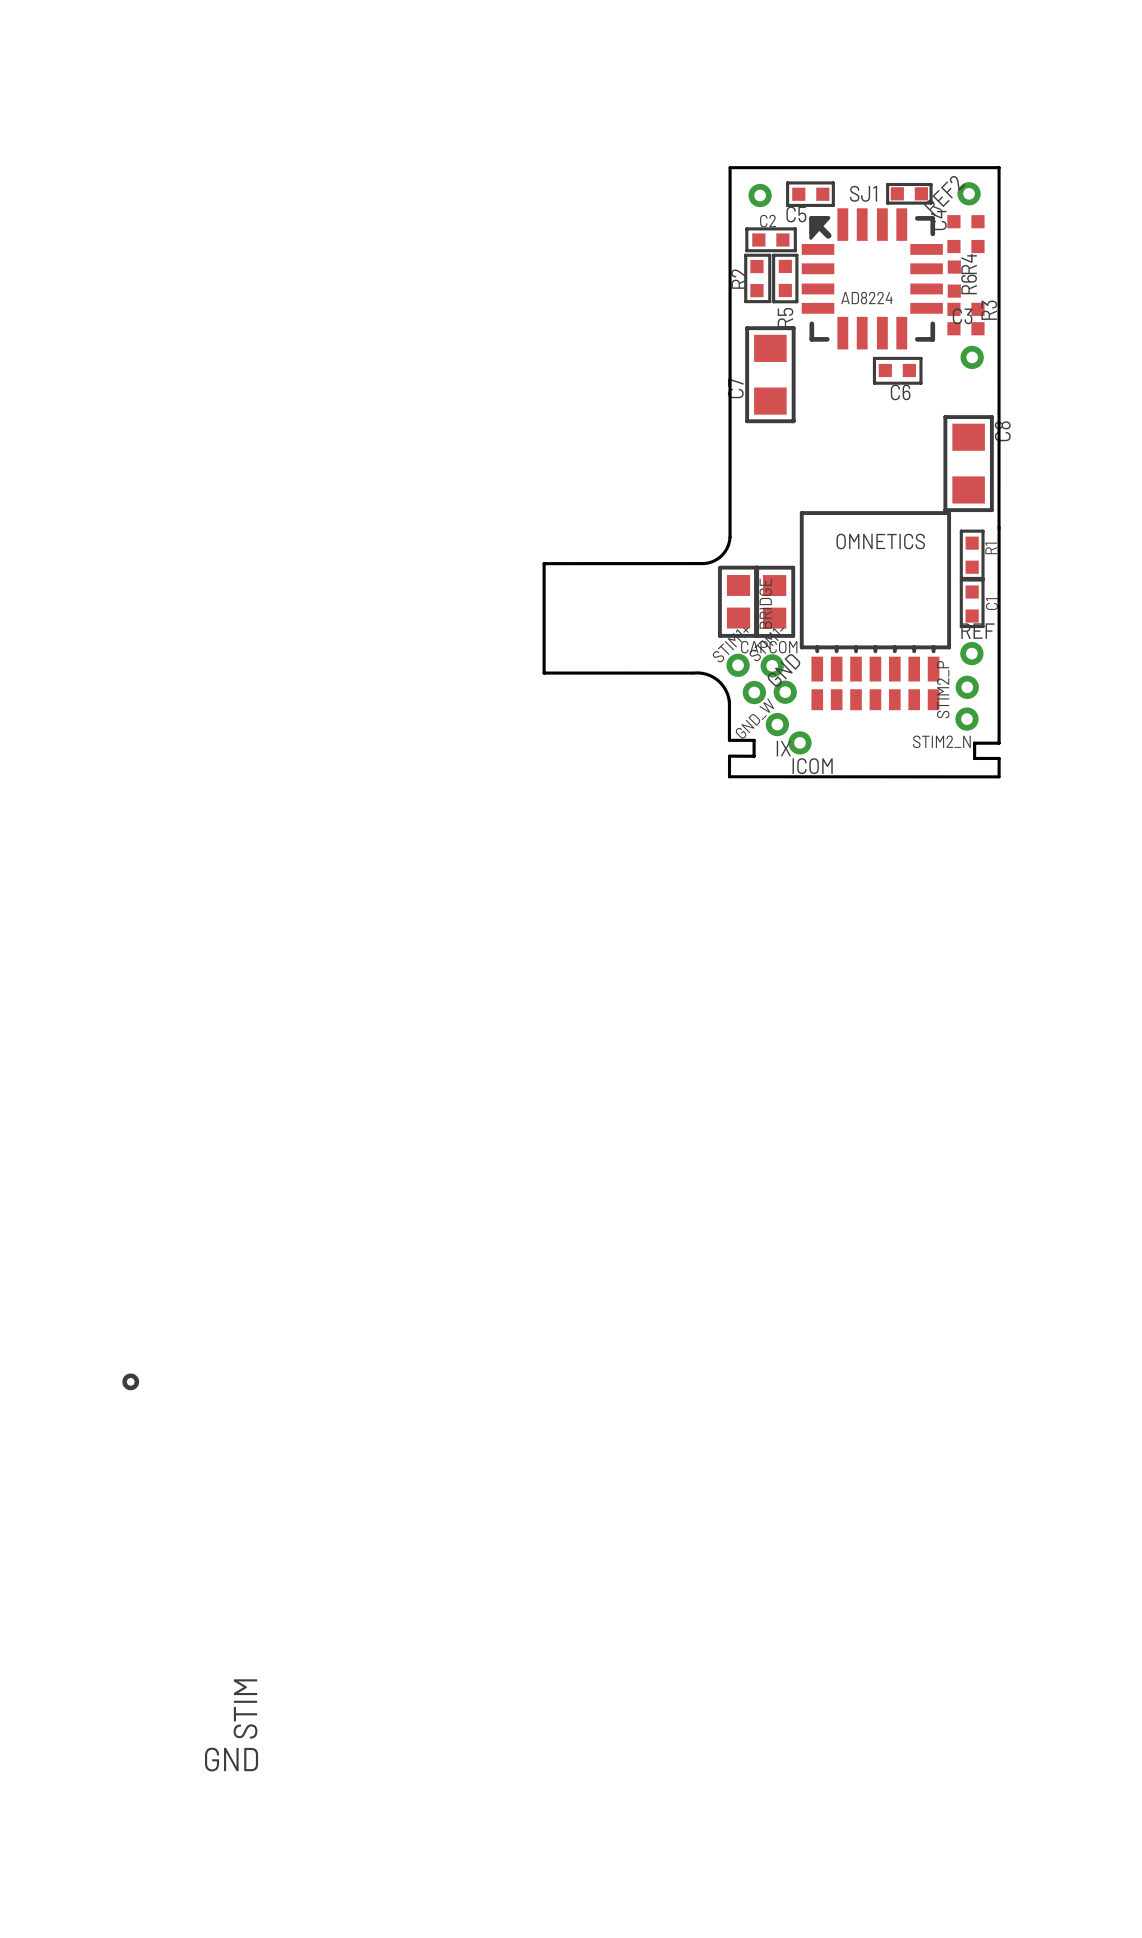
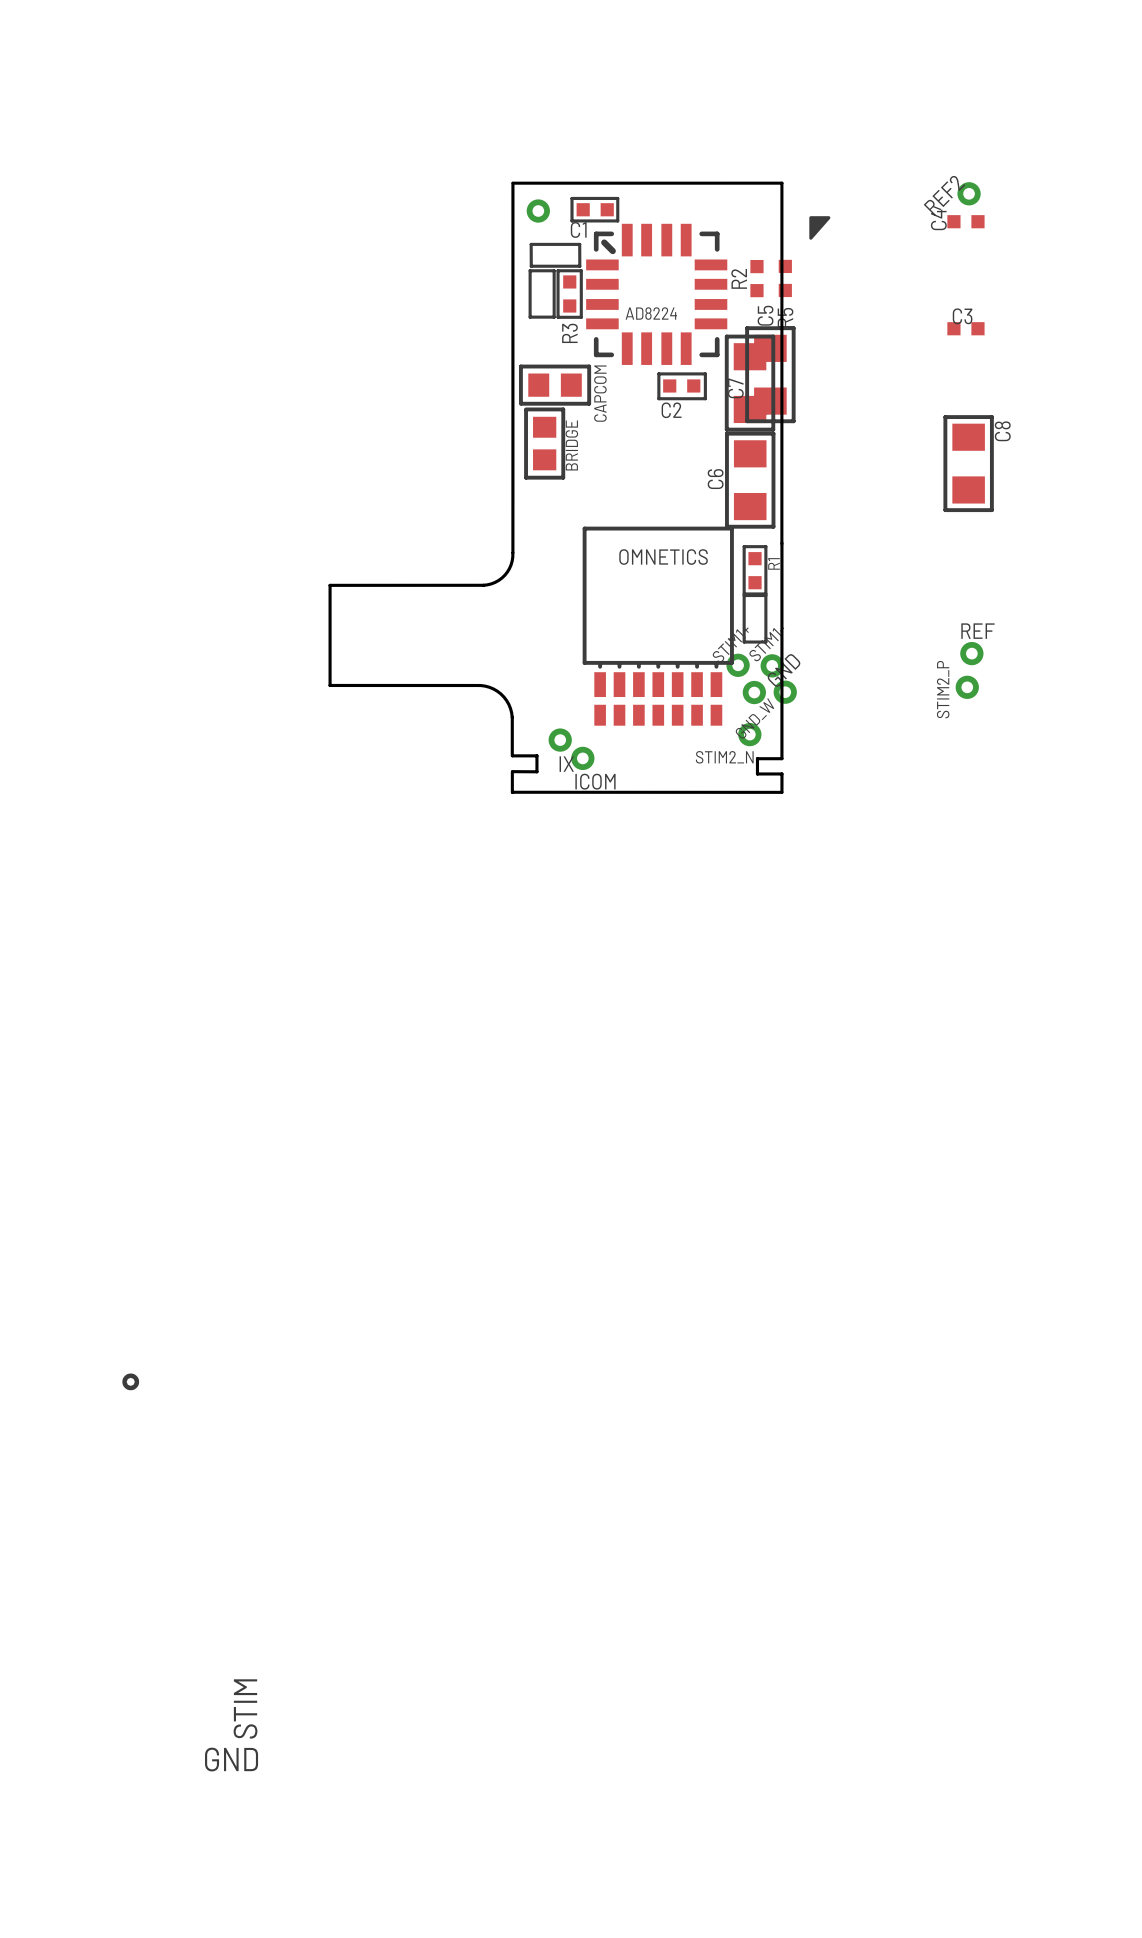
line: (787, 182) (787, 205) (833, 205) (833, 182) (787, 182) -> (572, 198) (572, 220) (617, 220) (617, 198) (572, 198)
line: (887, 184) (931, 184) (931, 203) (887, 203) (887, 184) -> none
C5 footprint: [792, 187, 830, 201] -> [724, 334, 776, 432]
SJ1: (909, 193) -> none
part position: (760, 195) -> (538, 211)
C5 name position: C5 (796, 214) -> C5 (765, 315)
C2 name position: C2 (768, 221) -> C2 (671, 410)
line: (819, 227) (828, 235) -> (604, 242) (612, 251)
line: (746, 228) (746, 250) (795, 250) (795, 228) (746, 228) -> (531, 244) (531, 266) (579, 266) (579, 244) (531, 244)
C2 position: (770, 239) -> (681, 385)
R4: (965, 246) -> none
line: (745, 255) (769, 255) (769, 301) (745, 301) (745, 255) -> (530, 270) (554, 270) (554, 317) (530, 317) (530, 270)
line: (773, 255) (796, 255) (796, 301) (773, 301) (773, 255) -> (558, 270) (581, 270) (581, 317) (558, 317) (558, 270)
AD8224 position: (872, 278) -> (656, 294)
R6: (954, 279) -> none
R3 rotation: 0° (965, 309) -> 90° clockwise (569, 293)
R3 position: (965, 309) -> (569, 293)
part: (972, 357) -> none
line: (874, 358) (920, 358) (920, 383) (874, 383) (874, 358) -> (658, 373) (705, 373) (705, 398) (658, 398) (658, 373)
C6 footprint: [878, 363, 916, 378] -> [725, 431, 776, 529]
board edge: (999, 527) (999, 743) (974, 743) (974, 758) (999, 758) (999, 776) (729, 776) (729, 756) -> (781, 543) (781, 758) (757, 758) (757, 773) (781, 773) (781, 792) (512, 792) (512, 771)
board edge: (999, 528) (999, 167) (730, 167) (730, 536) -> (781, 543) (781, 183) (512, 183) (512, 552)
line: (961, 531) (983, 531) (983, 578) (961, 578) (961, 531) -> (744, 546) (765, 546) (765, 593) (744, 593) (744, 546)
board edge: (730, 537) (723, 554) (707, 563) (544, 563) (544, 673) (692, 673) -> none
board edge: none -> (512, 553) (511, 564) (507, 572) (498, 580) (487, 584) (330, 585) (330, 685) (475, 685)
R1 position: (972, 555) -> (755, 570)
line: (961, 580) (961, 626) (983, 626) (983, 580) (961, 580) -> (744, 595) (744, 642) (765, 642) (765, 595) (744, 595)
BRIDGE position: (738, 601) -> (544, 443)
CAPCOM rotation: 0° (774, 601) -> 90° counterclockwise (555, 385)
CAPCOM position: (774, 601) -> (555, 385)
C1 rotation: 0° (972, 604) -> 90° clockwise (595, 209)
C1 position: (972, 604) -> (595, 209)
OMNETICS position: (875, 610) -> (658, 626)
board edge: (693, 673) (710, 675) (720, 682) (725, 689) (729, 701) (729, 740) -> (476, 685) (493, 688) (500, 693) (508, 704) (512, 717) (512, 755)
STIM2_N position: (966, 719) -> (749, 734)
IX position: (777, 724) -> (560, 740)
board edge: (729, 740) (754, 740) (754, 756) (729, 756) -> (512, 755) (536, 755) (536, 771) (512, 771)
ICOM position: (799, 742) -> (582, 758)

